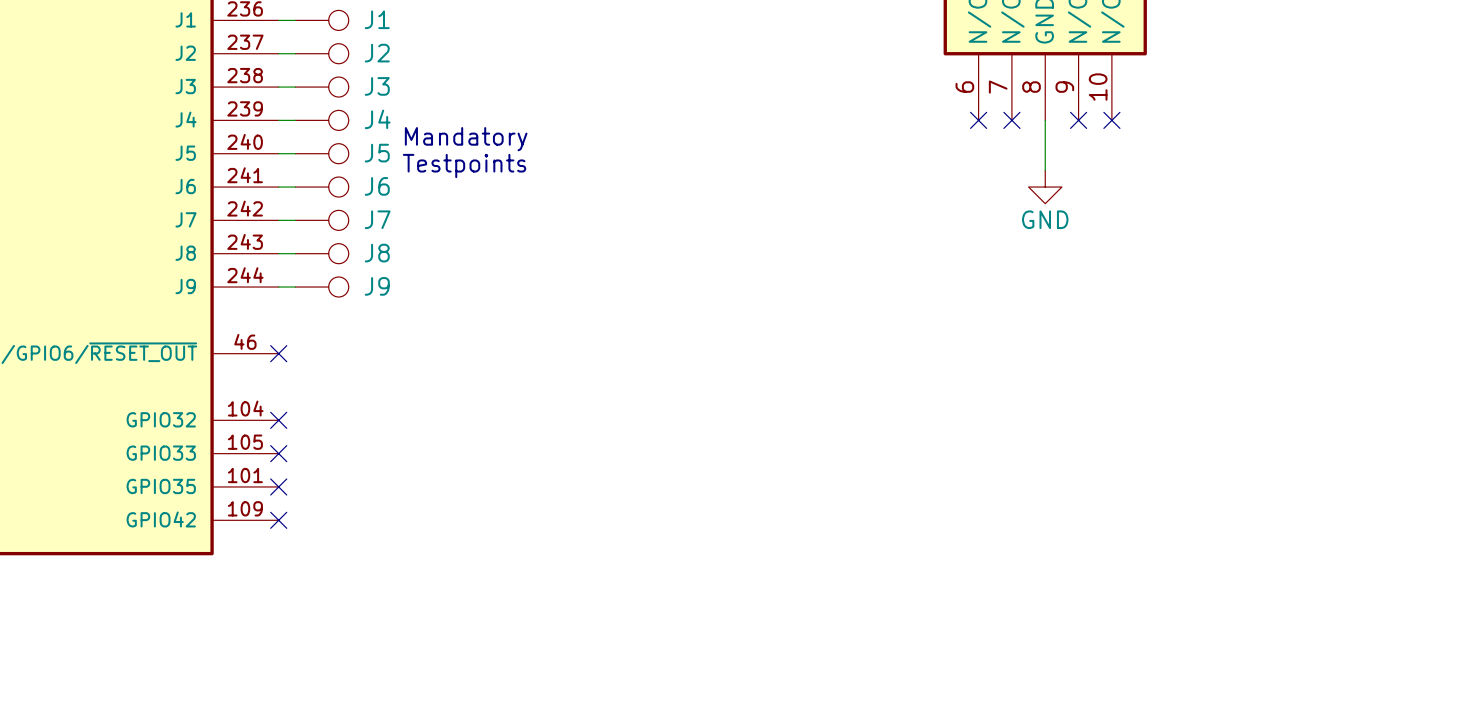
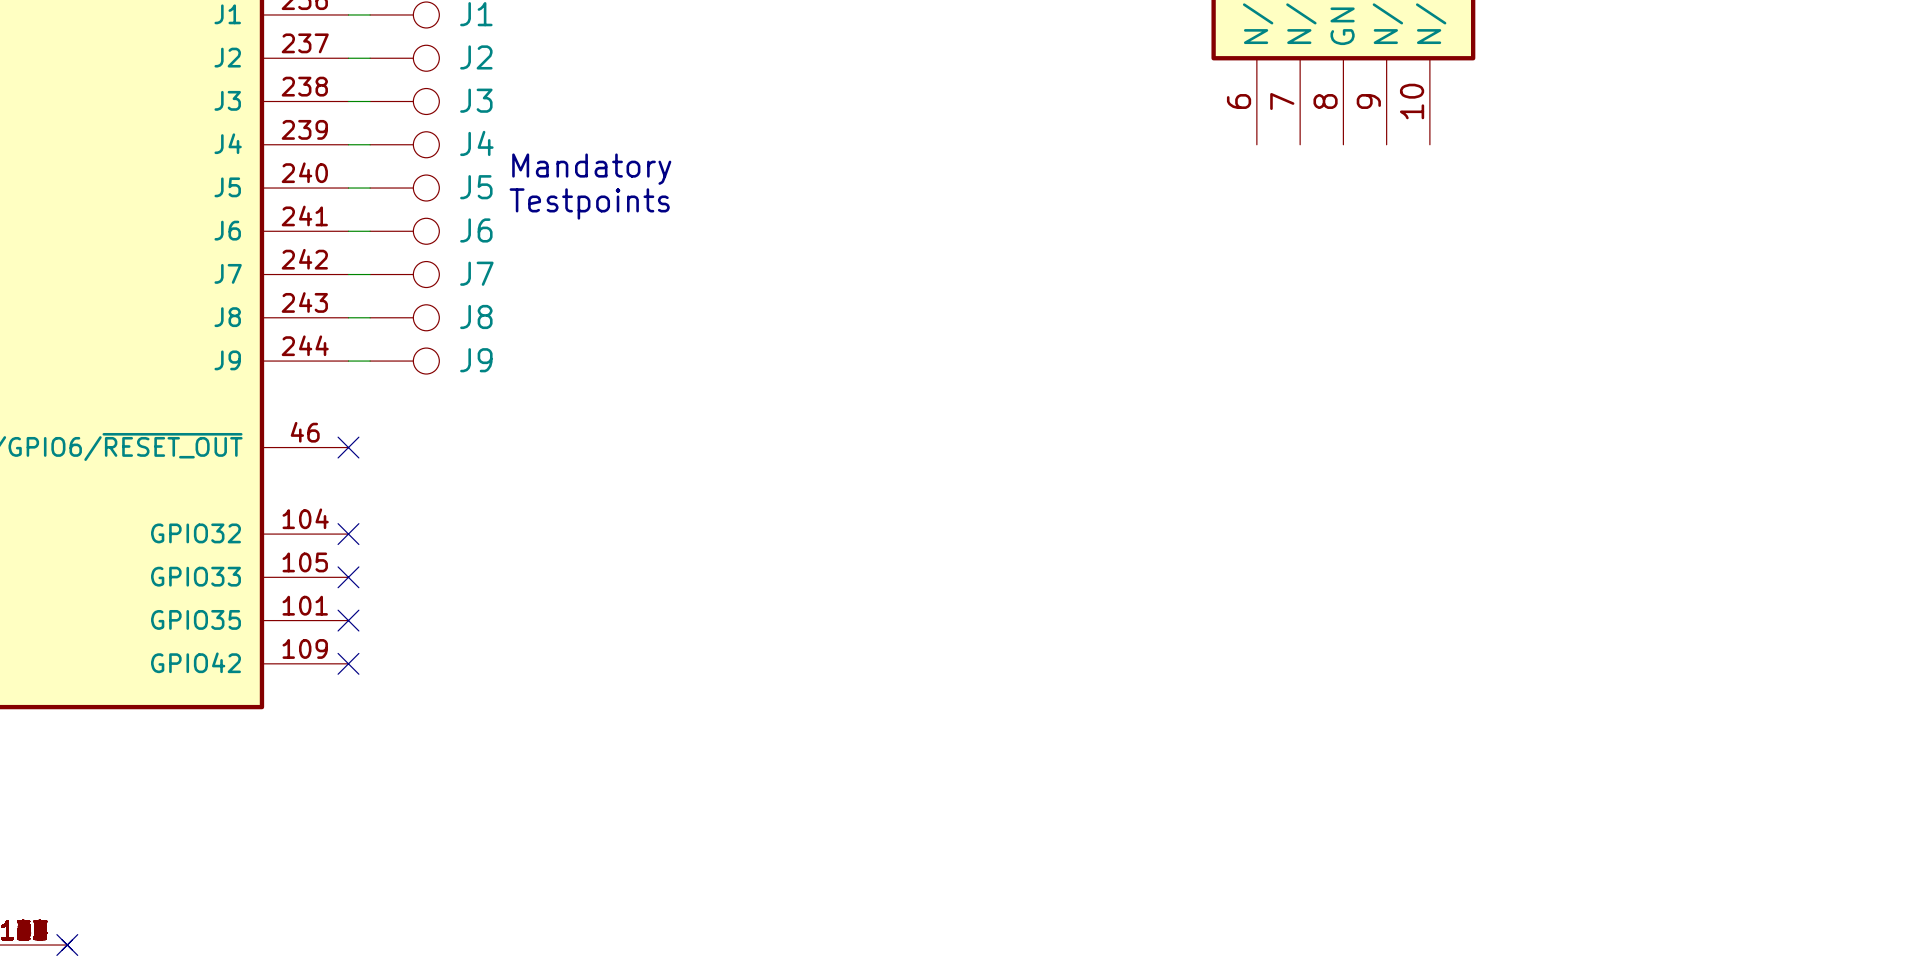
no-connect mark: (978, 120) -> none
no-connect mark: (1011, 120) -> none
wire: (1045, 120) (1045, 170) -> none
no-connect mark: (1078, 120) -> none
no-connect mark: (1111, 120) -> none
power symbol: GND (1045, 187) -> none

